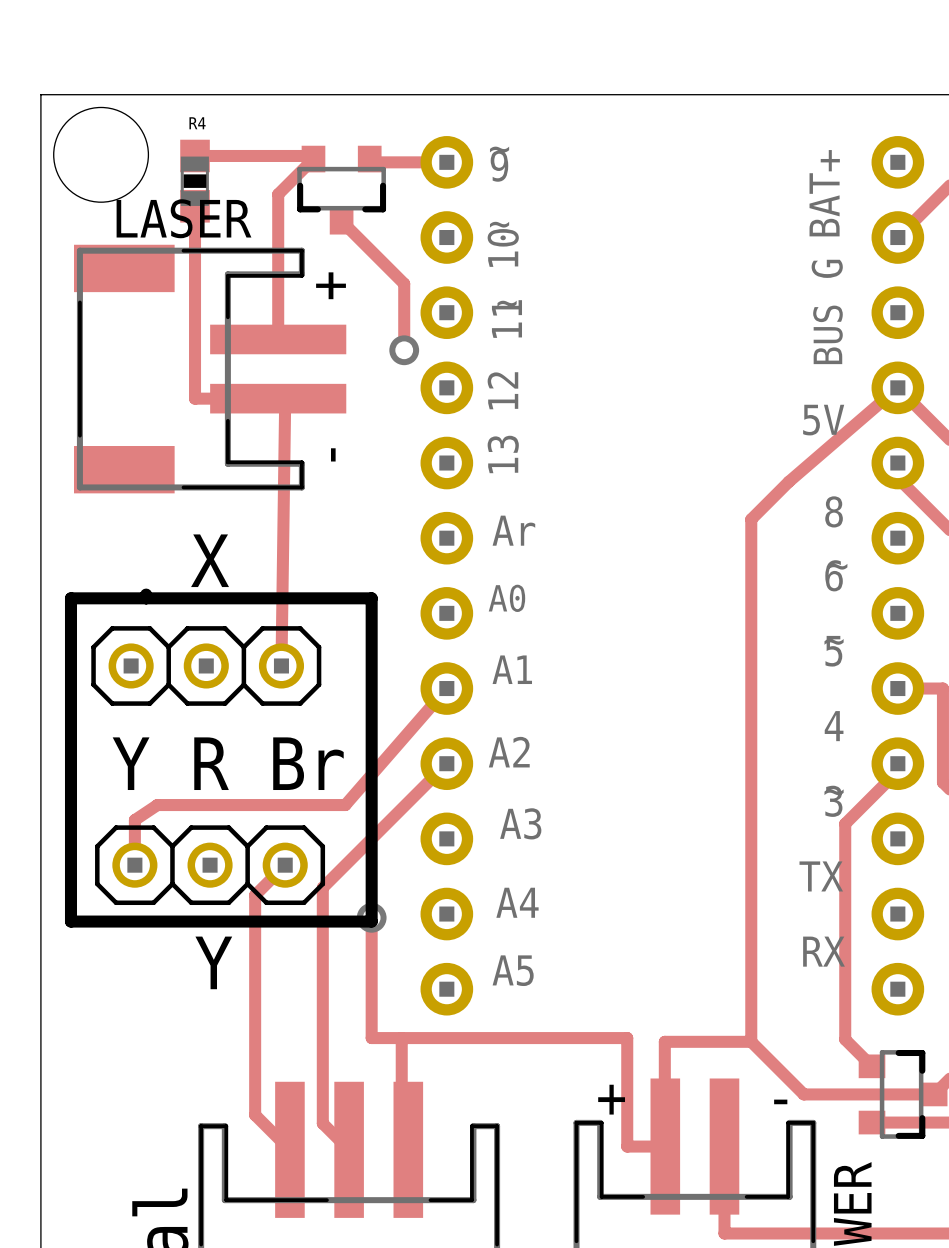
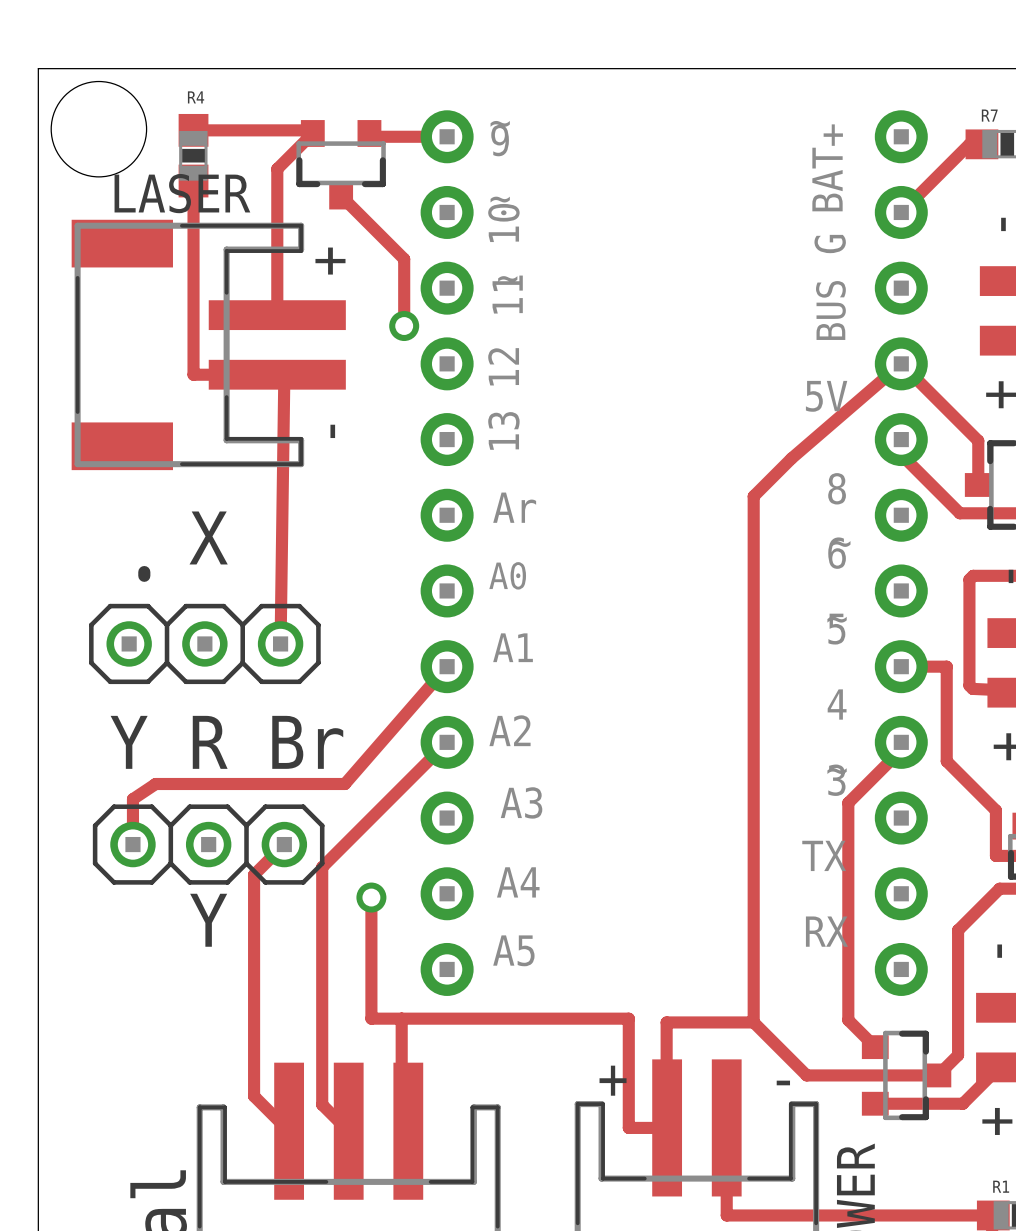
line: (70, 598) (371, 598) (371, 921) (70, 921) (70, 598) -> none
text position: Y (213, 962) -> Y (208, 920)

